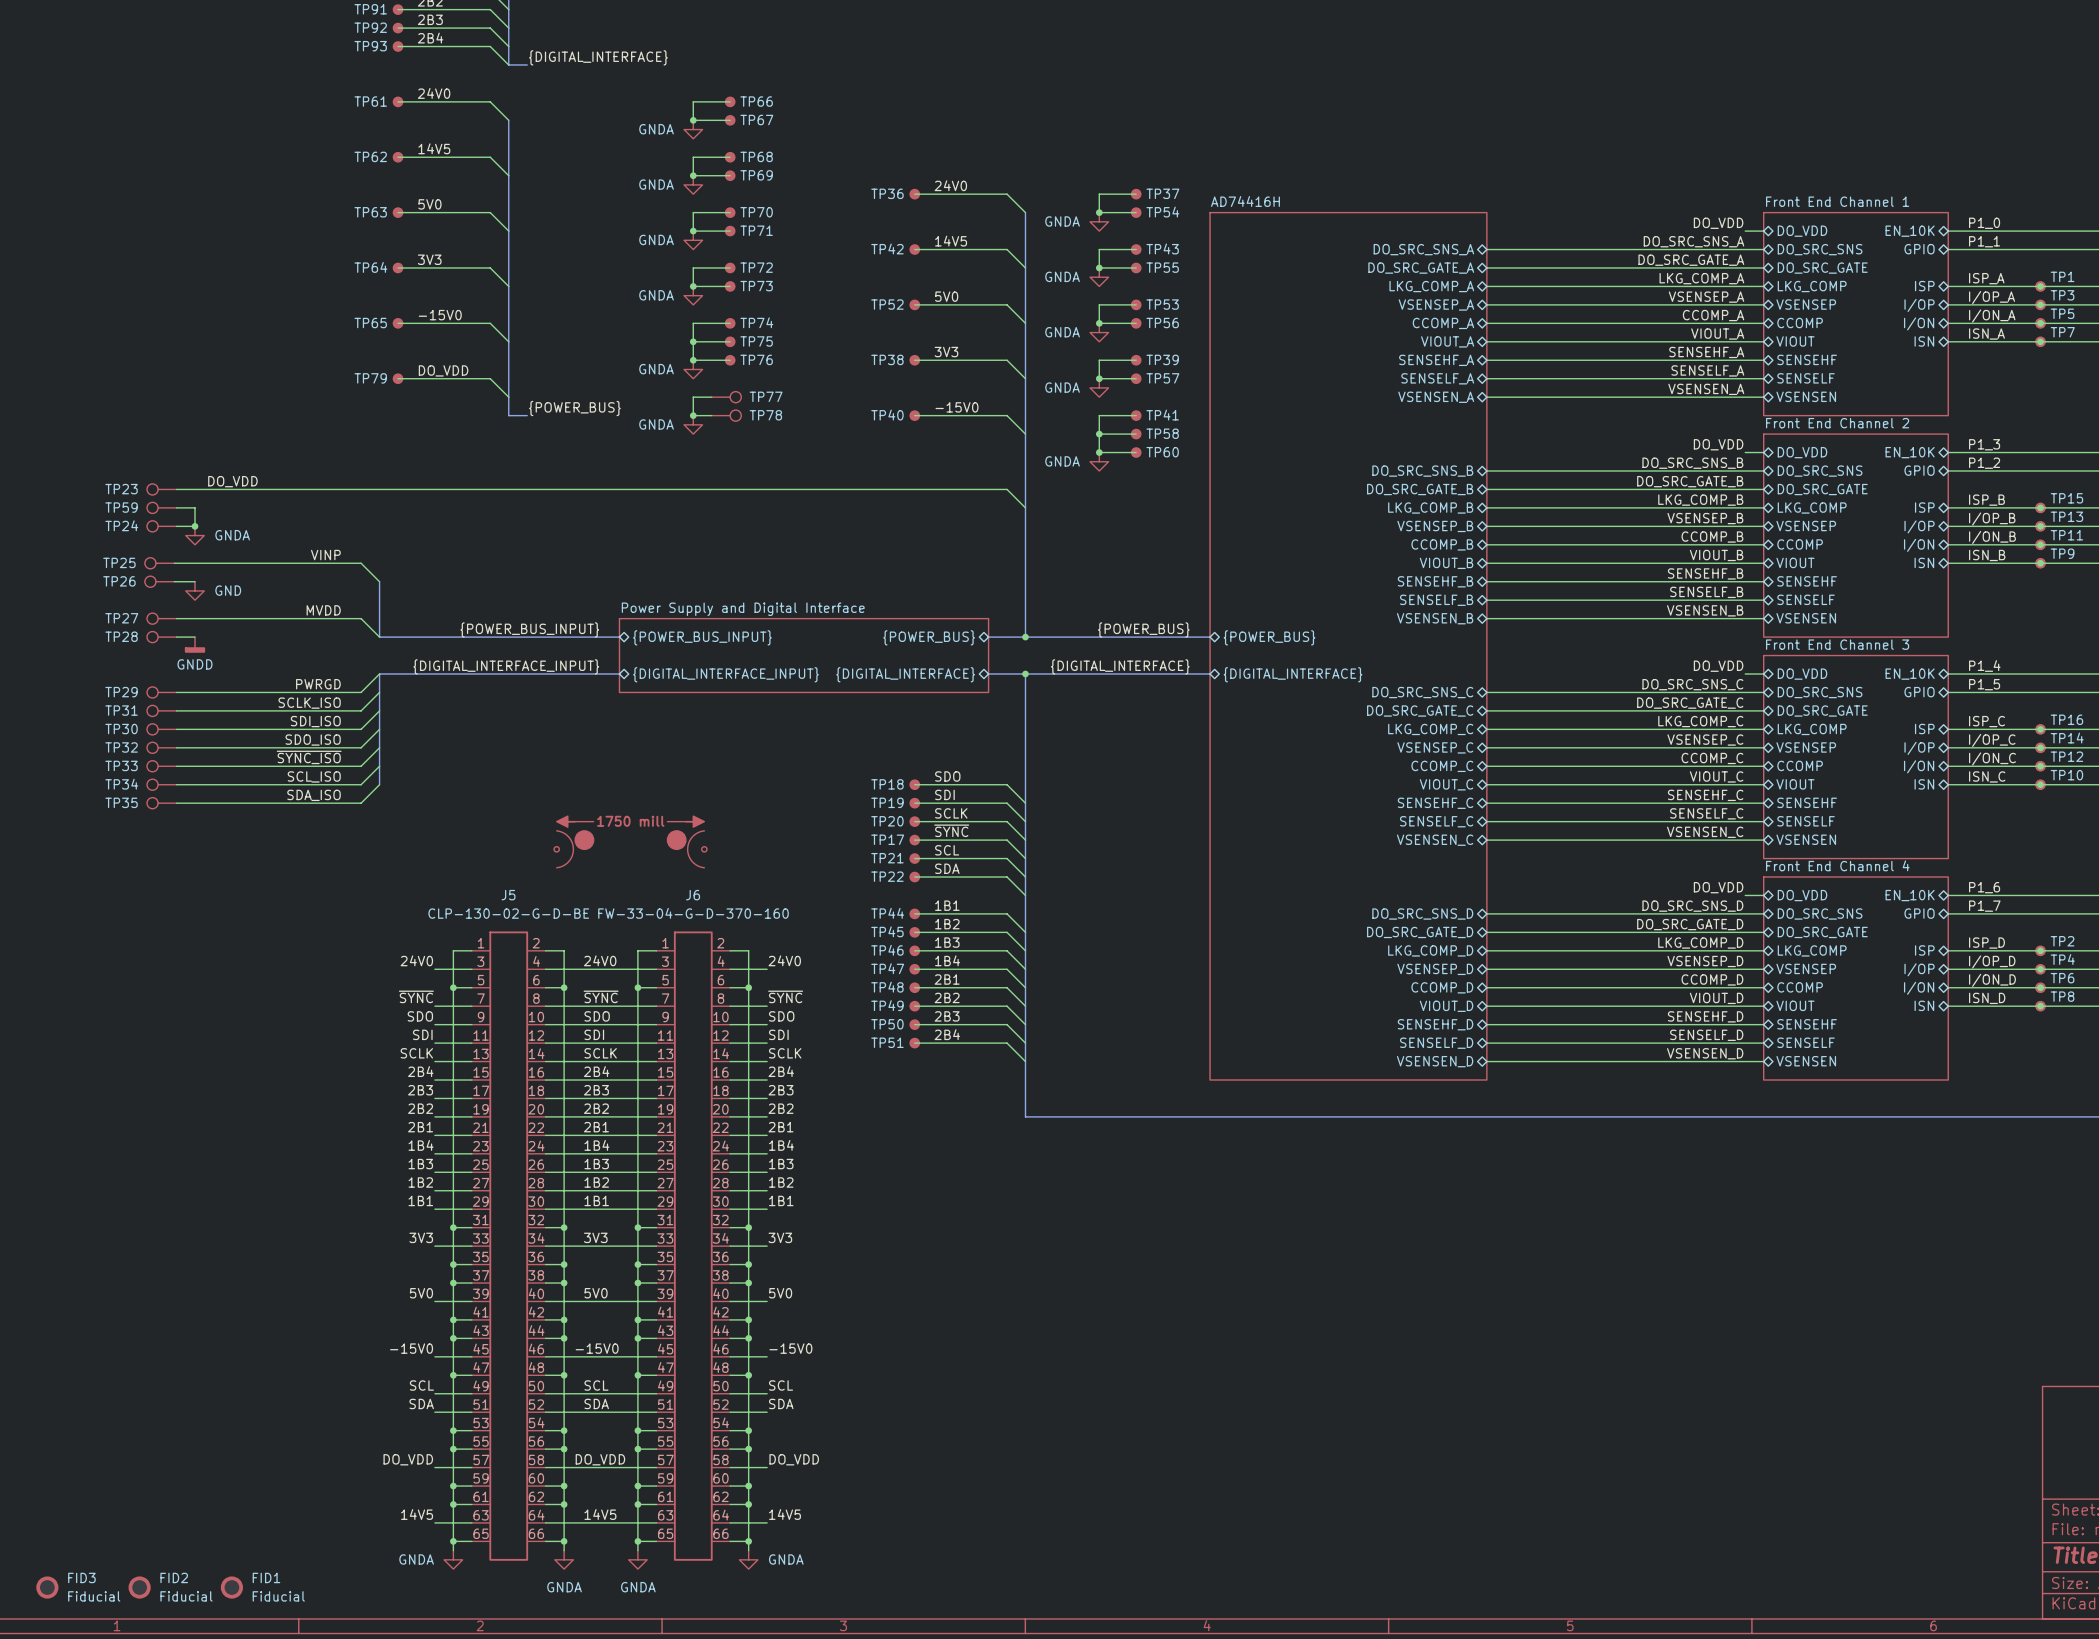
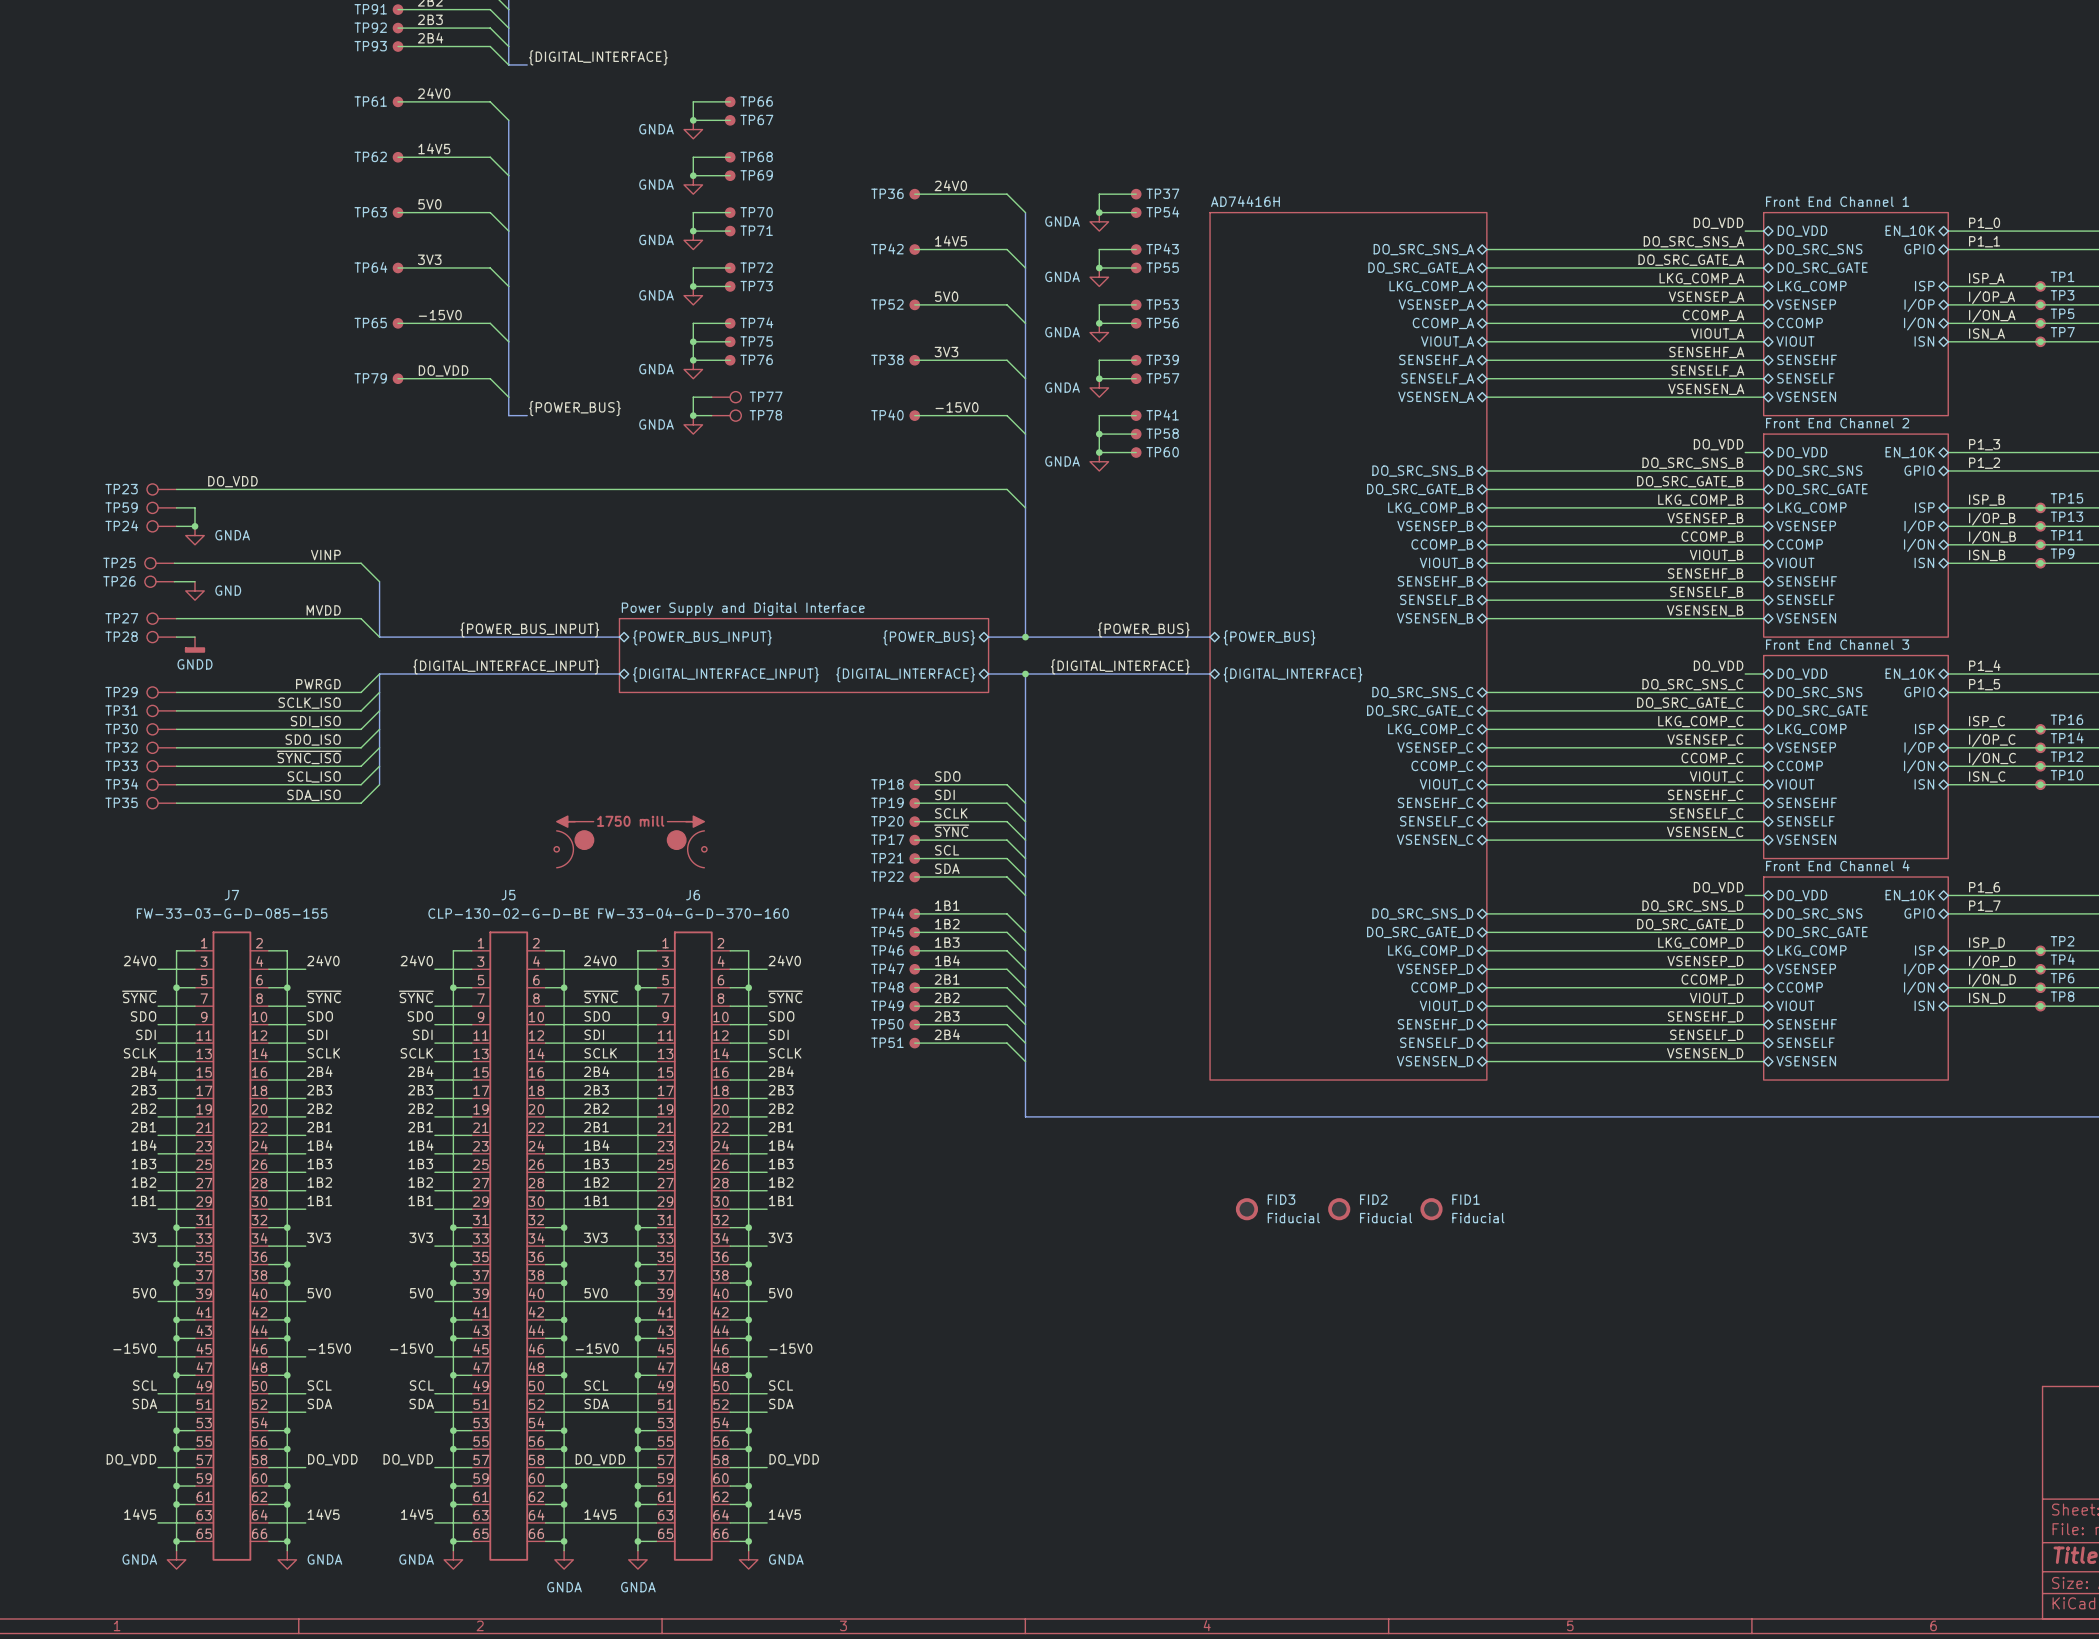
wire: none -> (195, 950) (176, 950) (176, 1550)
wire: none -> (268, 950) (287, 950) (287, 1550)
label: none -> 24V0 (140, 960)
label: none -> 24V0 (323, 960)
wire: none -> (158, 969) (195, 969)
wire: none -> (268, 969) (305, 969)
wire: none -> (176, 987) (195, 987)
junction: none -> (176, 987)
wire: none -> (268, 987) (287, 987)
junction: none -> (287, 987)
label: none -> ~{SYNC} (139, 996)
label: none -> ~{SYNC} (324, 996)
wire: none -> (158, 1006) (195, 1006)
wire: none -> (268, 1006) (305, 1006)
label: none -> SDO (143, 1016)
label: none -> SDO (320, 1016)
wire: none -> (158, 1024) (195, 1024)
wire: none -> (268, 1024) (305, 1024)
label: none -> SDI (145, 1034)
label: none -> SDI (317, 1034)
wire: none -> (158, 1043) (195, 1043)
wire: none -> (268, 1043) (305, 1043)
label: none -> SCLK (140, 1053)
label: none -> SCLK (323, 1053)
wire: none -> (158, 1061) (195, 1061)
wire: none -> (268, 1061) (305, 1061)
label: none -> 2B4 (143, 1071)
label: none -> 2B4 (319, 1071)
wire: none -> (158, 1080) (195, 1080)
wire: none -> (268, 1080) (305, 1080)
label: none -> 2B3 (143, 1090)
label: none -> 2B3 (319, 1090)
wire: none -> (158, 1098) (195, 1098)
wire: none -> (268, 1098) (305, 1098)
label: none -> 2B2 (143, 1108)
label: none -> 2B2 (319, 1108)
wire: none -> (158, 1116) (195, 1116)
wire: none -> (268, 1116) (305, 1116)
label: none -> 2B1 (143, 1127)
label: none -> 2B1 (319, 1127)
wire: none -> (158, 1135) (195, 1135)
wire: none -> (268, 1135) (305, 1135)
label: none -> 1B4 (144, 1145)
label: none -> 1B4 (320, 1145)
wire: none -> (158, 1153) (195, 1153)
wire: none -> (268, 1153) (305, 1153)
label: none -> 1B3 (143, 1164)
label: none -> 1B3 (319, 1164)
wire: none -> (158, 1172) (195, 1172)
wire: none -> (268, 1172) (305, 1172)
label: none -> 1B2 (143, 1182)
label: none -> 1B2 (319, 1182)
wire: none -> (158, 1190) (195, 1190)
wire: none -> (268, 1190) (305, 1190)
label: none -> 1B1 (143, 1200)
label: none -> 1B1 (319, 1200)
wire: none -> (158, 1209) (195, 1209)
wire: none -> (268, 1209) (305, 1209)
wire: none -> (176, 1227) (195, 1227)
junction: none -> (176, 1227)
wire: none -> (268, 1227) (287, 1227)
junction: none -> (287, 1227)
label: none -> 3V3 (144, 1237)
label: none -> 3V3 (318, 1237)
wire: none -> (158, 1246) (195, 1246)
J7: none -> FW-33-03-G-D-085-155 (231, 1246)
wire: none -> (268, 1246) (305, 1246)
wire: none -> (176, 1264) (195, 1264)
junction: none -> (176, 1264)
wire: none -> (268, 1264) (287, 1264)
junction: none -> (287, 1264)
wire: none -> (176, 1283) (195, 1283)
junction: none -> (176, 1283)
wire: none -> (268, 1283) (287, 1283)
junction: none -> (287, 1283)
label: none -> 5V0 (144, 1293)
label: none -> 5V0 (319, 1293)
wire: none -> (158, 1301) (195, 1301)
wire: none -> (268, 1301) (305, 1301)
wire: none -> (176, 1319) (195, 1319)
junction: none -> (176, 1319)
wire: none -> (268, 1319) (287, 1319)
junction: none -> (287, 1319)
wire: none -> (176, 1338) (195, 1338)
junction: none -> (176, 1338)
wire: none -> (268, 1338) (287, 1338)
junction: none -> (287, 1338)
label: none -> -15V0 (134, 1348)
label: none -> -15V0 (329, 1348)
wire: none -> (158, 1356) (195, 1356)
wire: none -> (268, 1356) (305, 1356)
wire: none -> (176, 1375) (195, 1375)
junction: none -> (176, 1375)
wire: none -> (268, 1375) (287, 1375)
junction: none -> (287, 1375)
label: none -> SCL (145, 1385)
label: none -> SCL (319, 1385)
wire: none -> (158, 1393) (195, 1393)
wire: none -> (268, 1393) (305, 1393)
label: none -> SDA (144, 1403)
label: none -> SDA (319, 1403)
wire: none -> (158, 1412) (195, 1412)
wire: none -> (268, 1412) (305, 1412)
wire: none -> (176, 1430) (195, 1430)
junction: none -> (176, 1430)
wire: none -> (268, 1430) (287, 1430)
junction: none -> (287, 1430)
wire: none -> (176, 1449) (195, 1449)
junction: none -> (176, 1449)
wire: none -> (268, 1449) (287, 1449)
junction: none -> (287, 1449)
label: none -> DO_VDD (131, 1459)
label: none -> DO_VDD (332, 1459)
wire: none -> (158, 1467) (195, 1467)
wire: none -> (268, 1467) (305, 1467)
wire: none -> (176, 1486) (195, 1486)
junction: none -> (176, 1486)
wire: none -> (268, 1486) (287, 1486)
junction: none -> (287, 1486)
wire: none -> (176, 1504) (195, 1504)
junction: none -> (176, 1504)
wire: none -> (268, 1504) (287, 1504)
junction: none -> (287, 1504)
label: none -> 14V5 (140, 1514)
label: none -> 14V5 (323, 1514)
wire: none -> (158, 1522) (195, 1522)
wire: none -> (268, 1522) (305, 1522)
wire: none -> (176, 1541) (195, 1541)
junction: none -> (176, 1541)
wire: none -> (268, 1541) (287, 1541)
junction: none -> (287, 1541)
power symbol: none -> GNDA (176, 1559)
power symbol: none -> GNDA (287, 1559)
FID3 position: (47, 1587) -> (1246, 1209)
FID2 position: (139, 1587) -> (1339, 1209)
FID1 position: (231, 1587) -> (1431, 1209)

